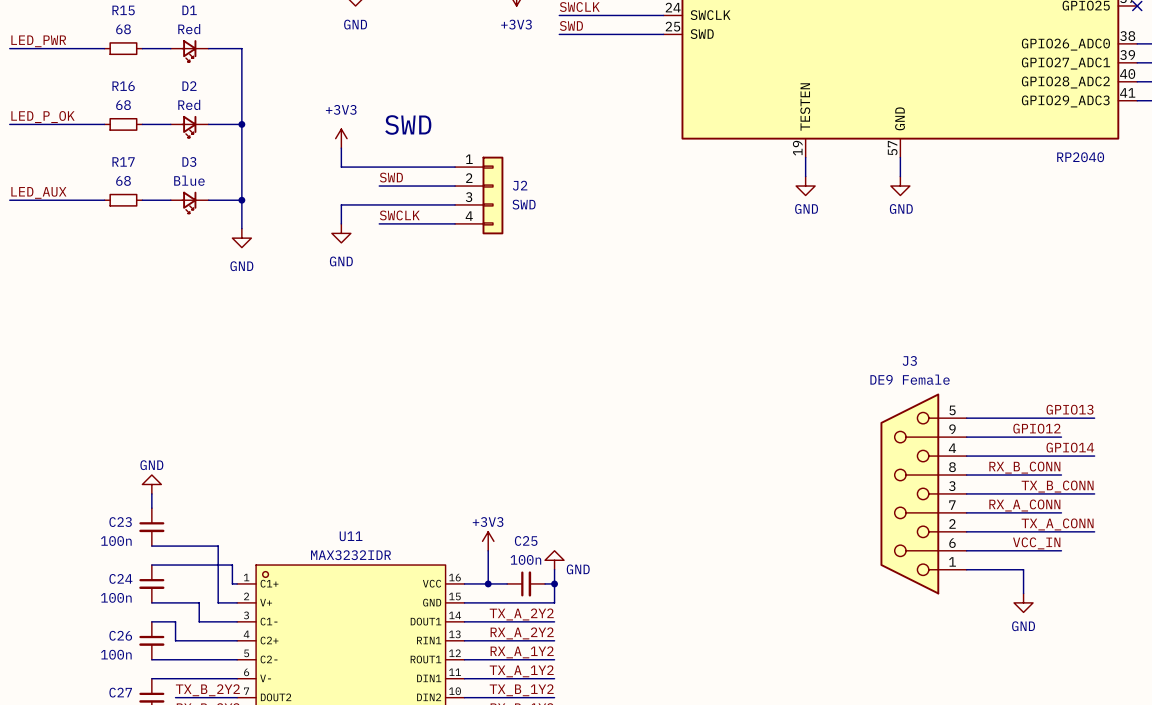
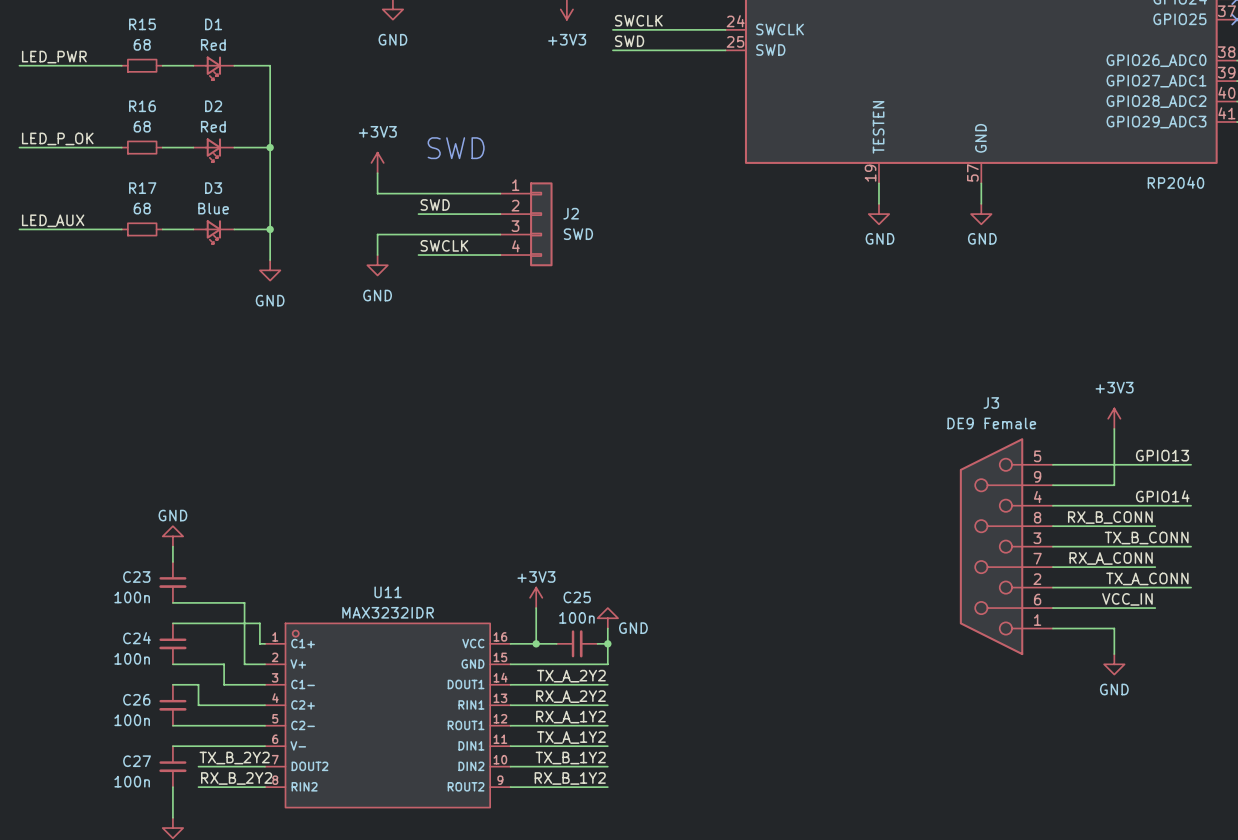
power symbol: none -> +3V3 (1114, 418)
label: GPIO12 (1036, 428) -> none
wire: (1023, 437) (1061, 437) -> (1114, 485) (1114, 428)

